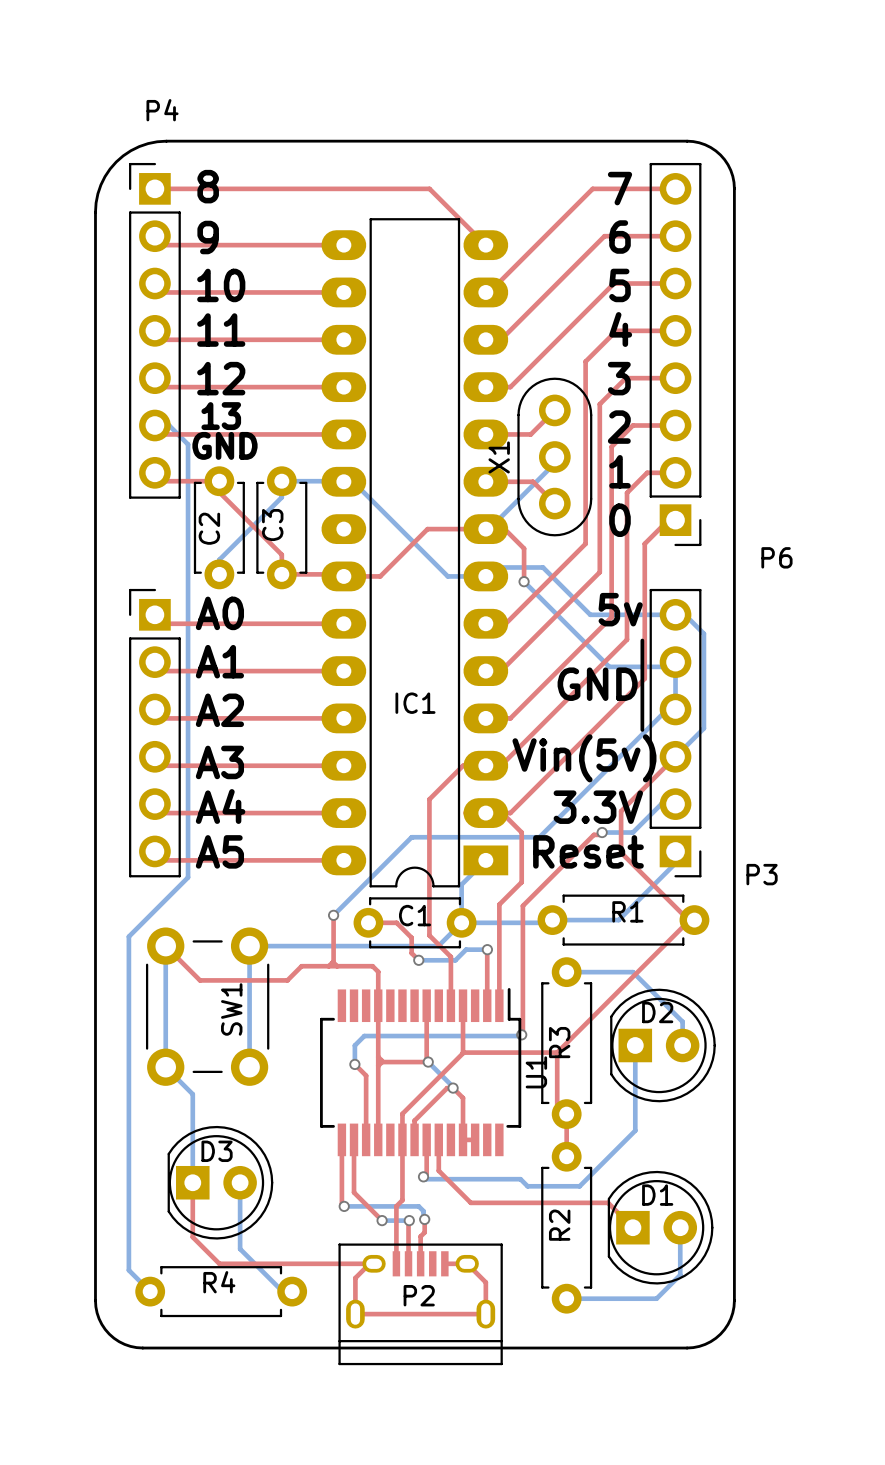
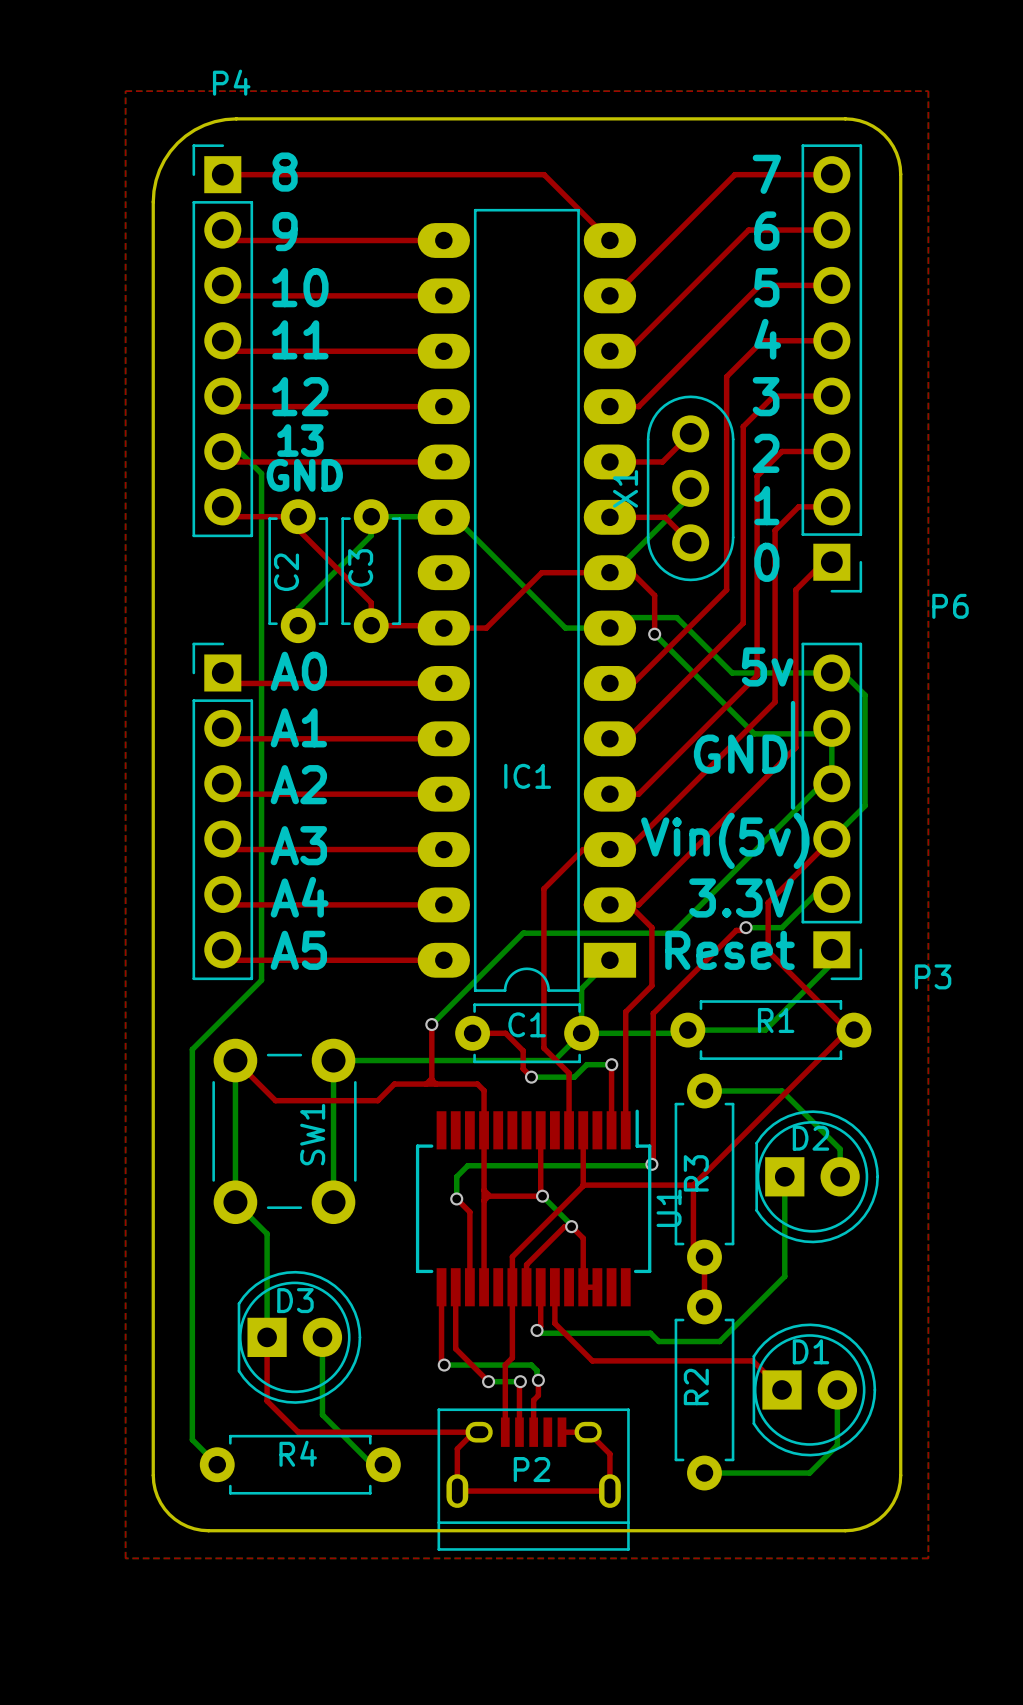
top zone outline: none -> (125, 91) (125, 1558) (928, 1558) (928, 91) (125, 91)

